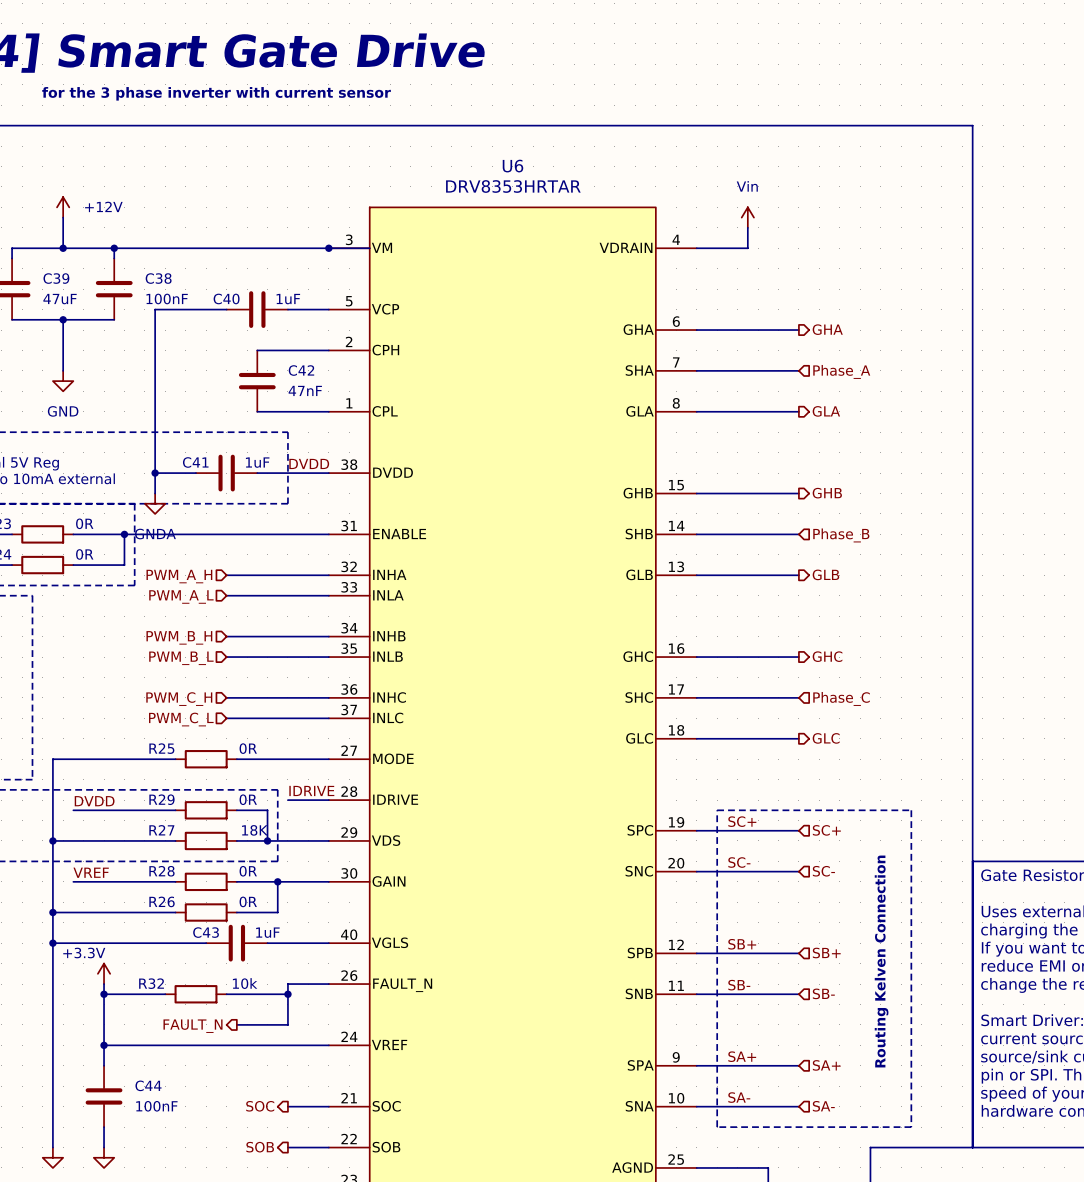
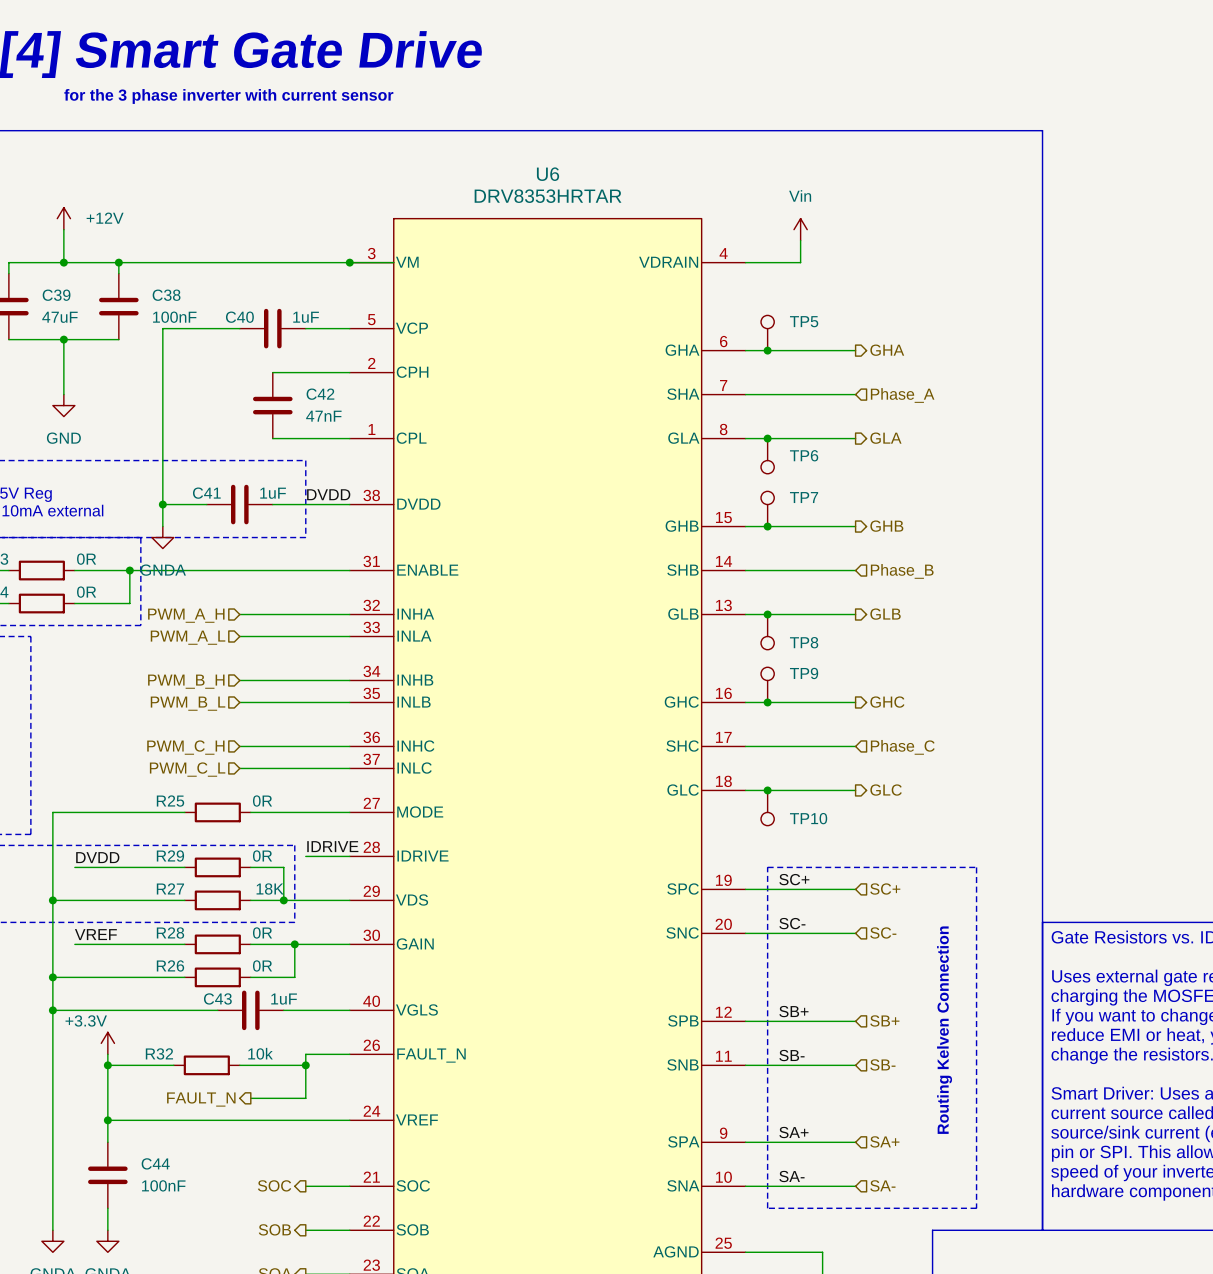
TP5: none -> (767, 333)
junction: none -> (767, 350)
junction: none -> (767, 438)
TP6: none -> (767, 456)
TP7: none -> (767, 508)
junction: none -> (767, 526)
junction: none -> (767, 614)
TP8: none -> (767, 632)
TP9: none -> (767, 684)
junction: none -> (767, 702)
junction: none -> (767, 790)
TP10: none -> (767, 808)

